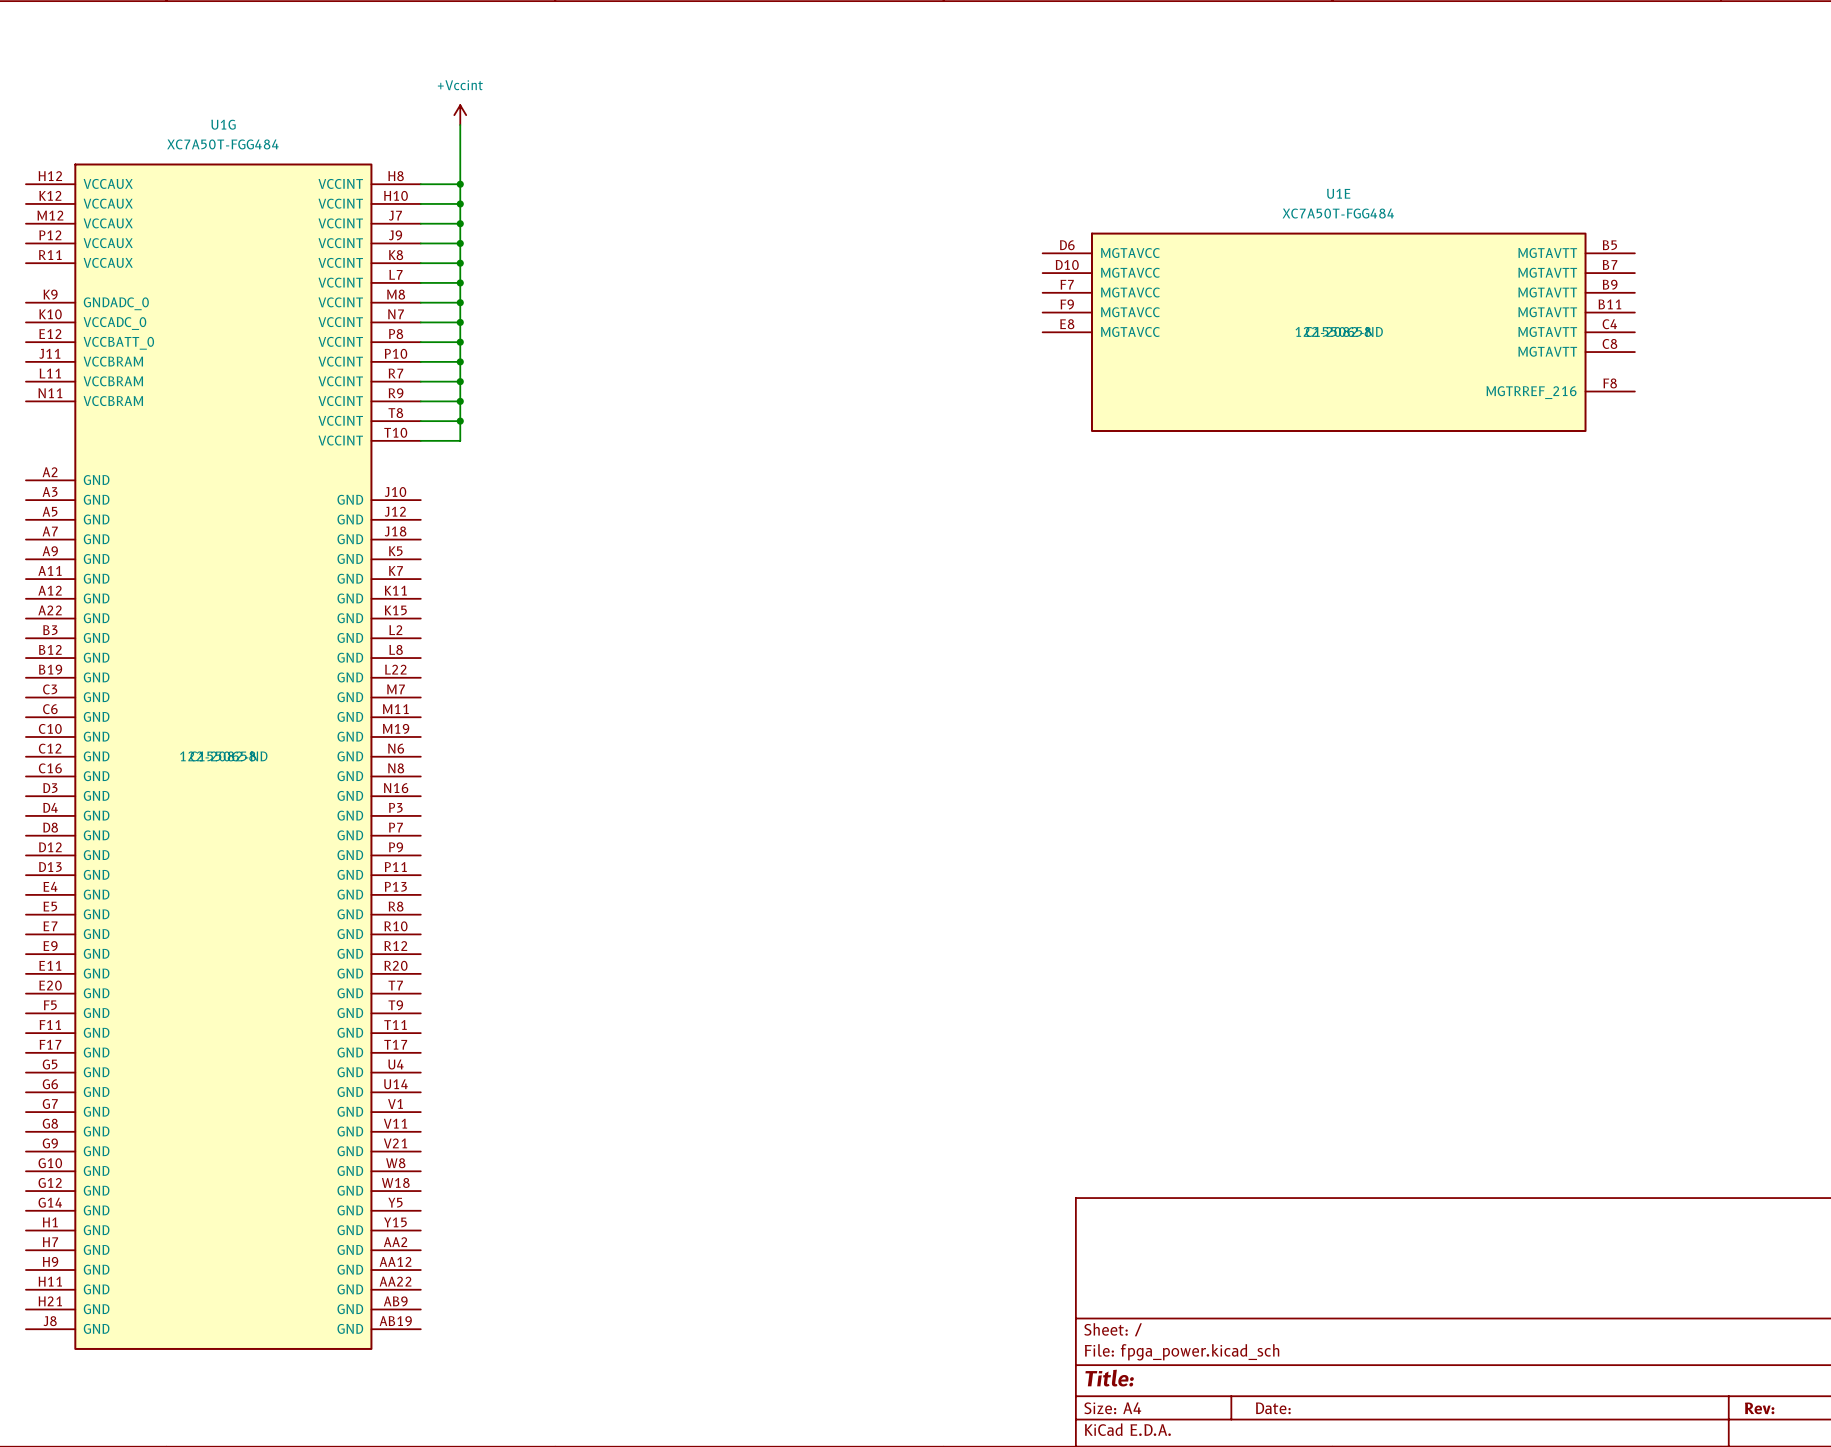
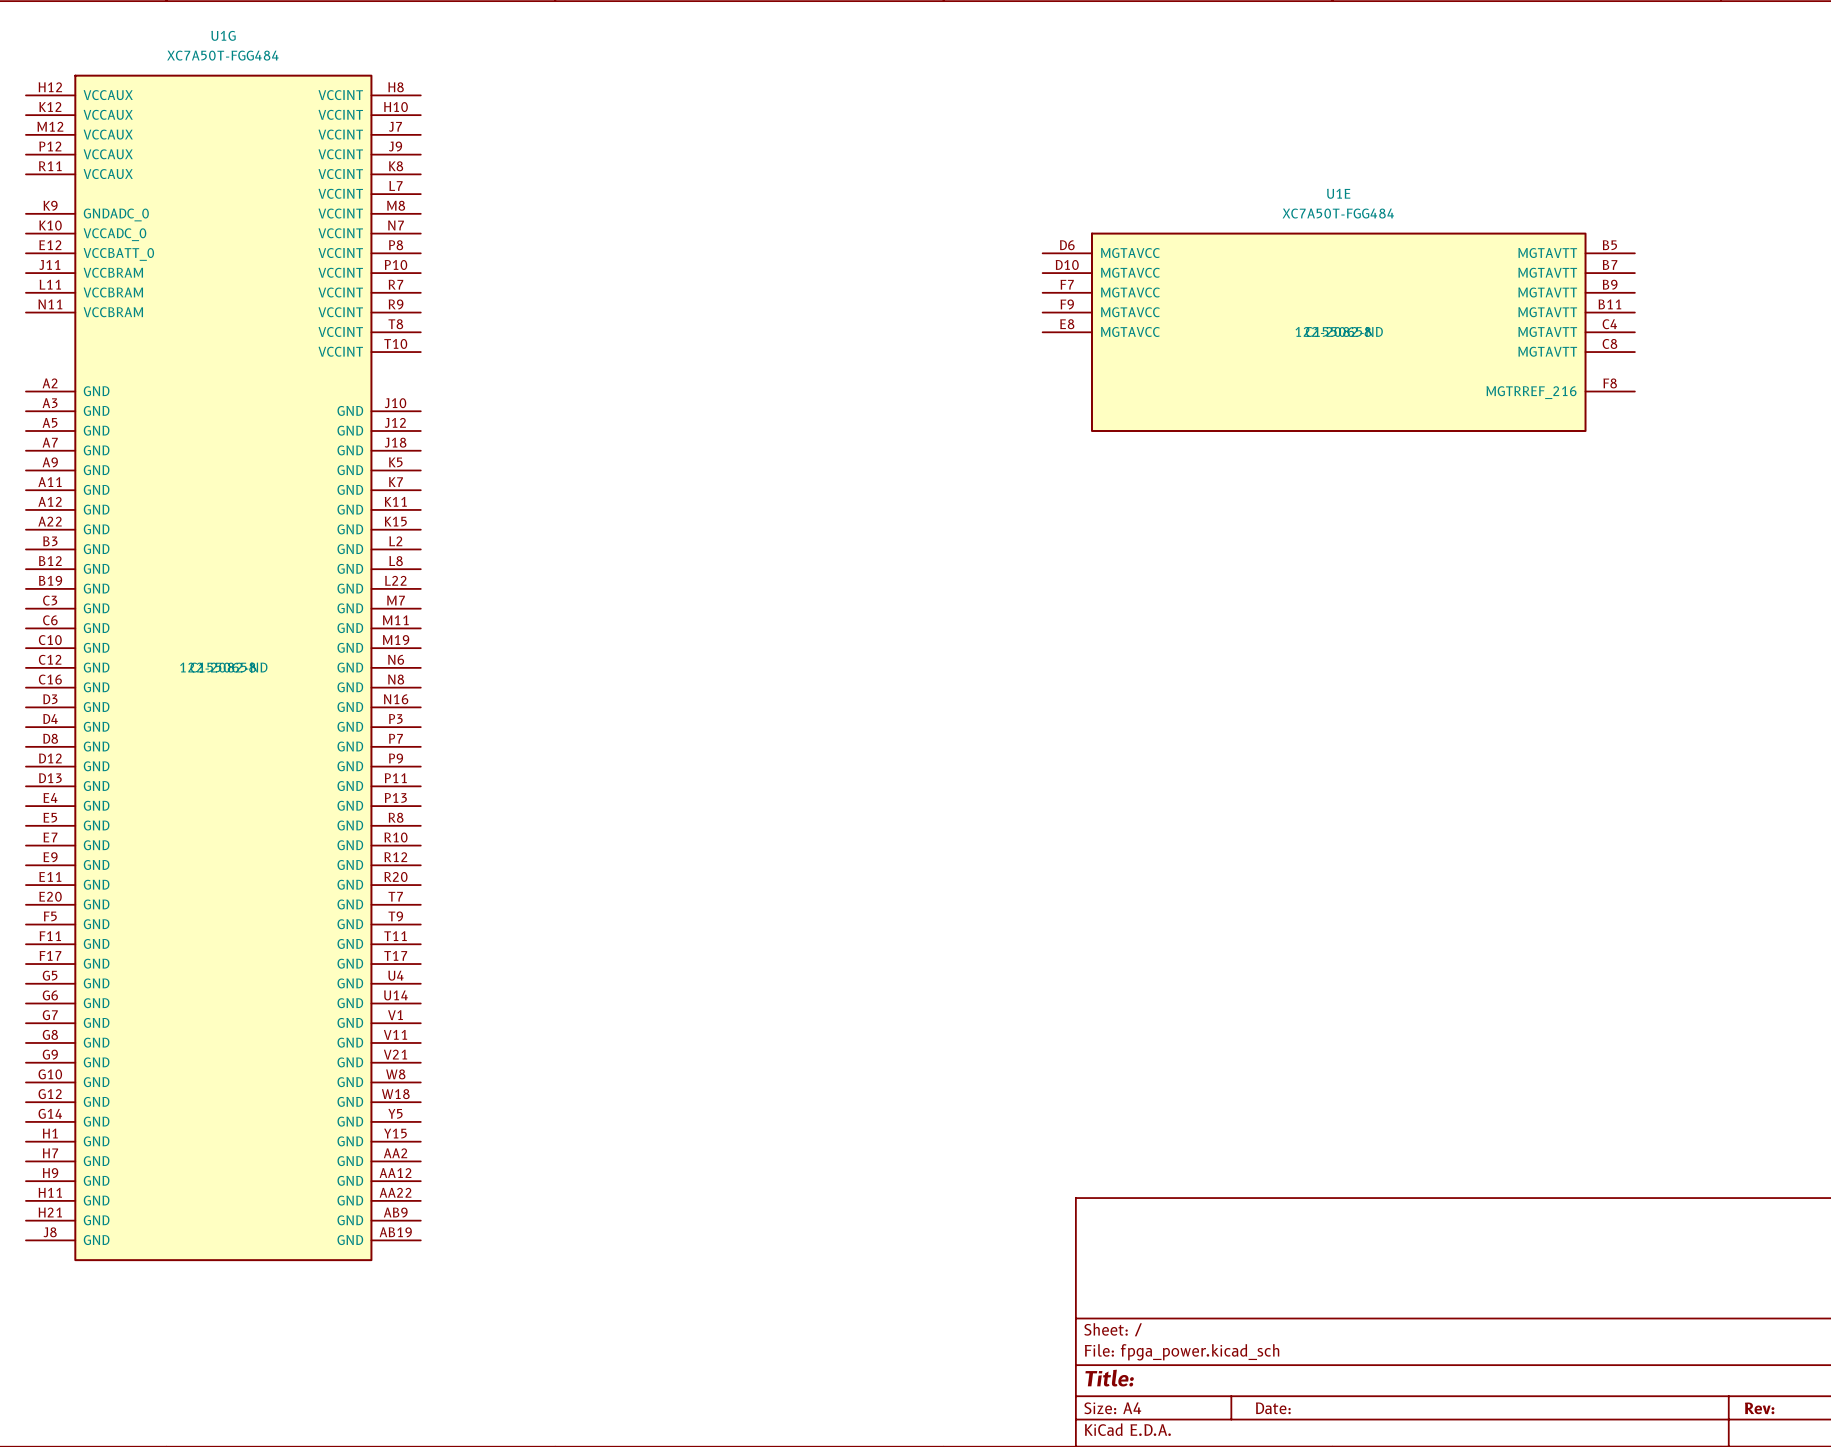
power symbol: +Vccint (460, 115) -> none
wire: (460, 125) (460, 440) (420, 440) -> none
wire: (420, 184) (460, 184) -> none
junction: (460, 184) -> none
wire: (420, 203) (460, 203) -> none
junction: (460, 203) -> none
wire: (420, 223) (460, 223) -> none
junction: (460, 223) -> none
wire: (420, 243) (460, 243) -> none
junction: (460, 243) -> none
wire: (420, 263) (460, 263) -> none
junction: (460, 263) -> none
wire: (420, 282) (460, 282) -> none
junction: (460, 282) -> none
wire: (420, 302) (460, 302) -> none
junction: (460, 302) -> none
wire: (420, 322) (460, 322) -> none
junction: (460, 322) -> none
wire: (420, 342) (460, 342) -> none
junction: (460, 342) -> none
wire: (420, 361) (460, 361) -> none
junction: (460, 361) -> none
wire: (420, 381) (460, 381) -> none
junction: (460, 381) -> none
wire: (420, 401) (460, 401) -> none
junction: (460, 401) -> none
wire: (420, 421) (460, 421) -> none
junction: (460, 421) -> none
U1G position: (223, 756) -> (223, 667)

